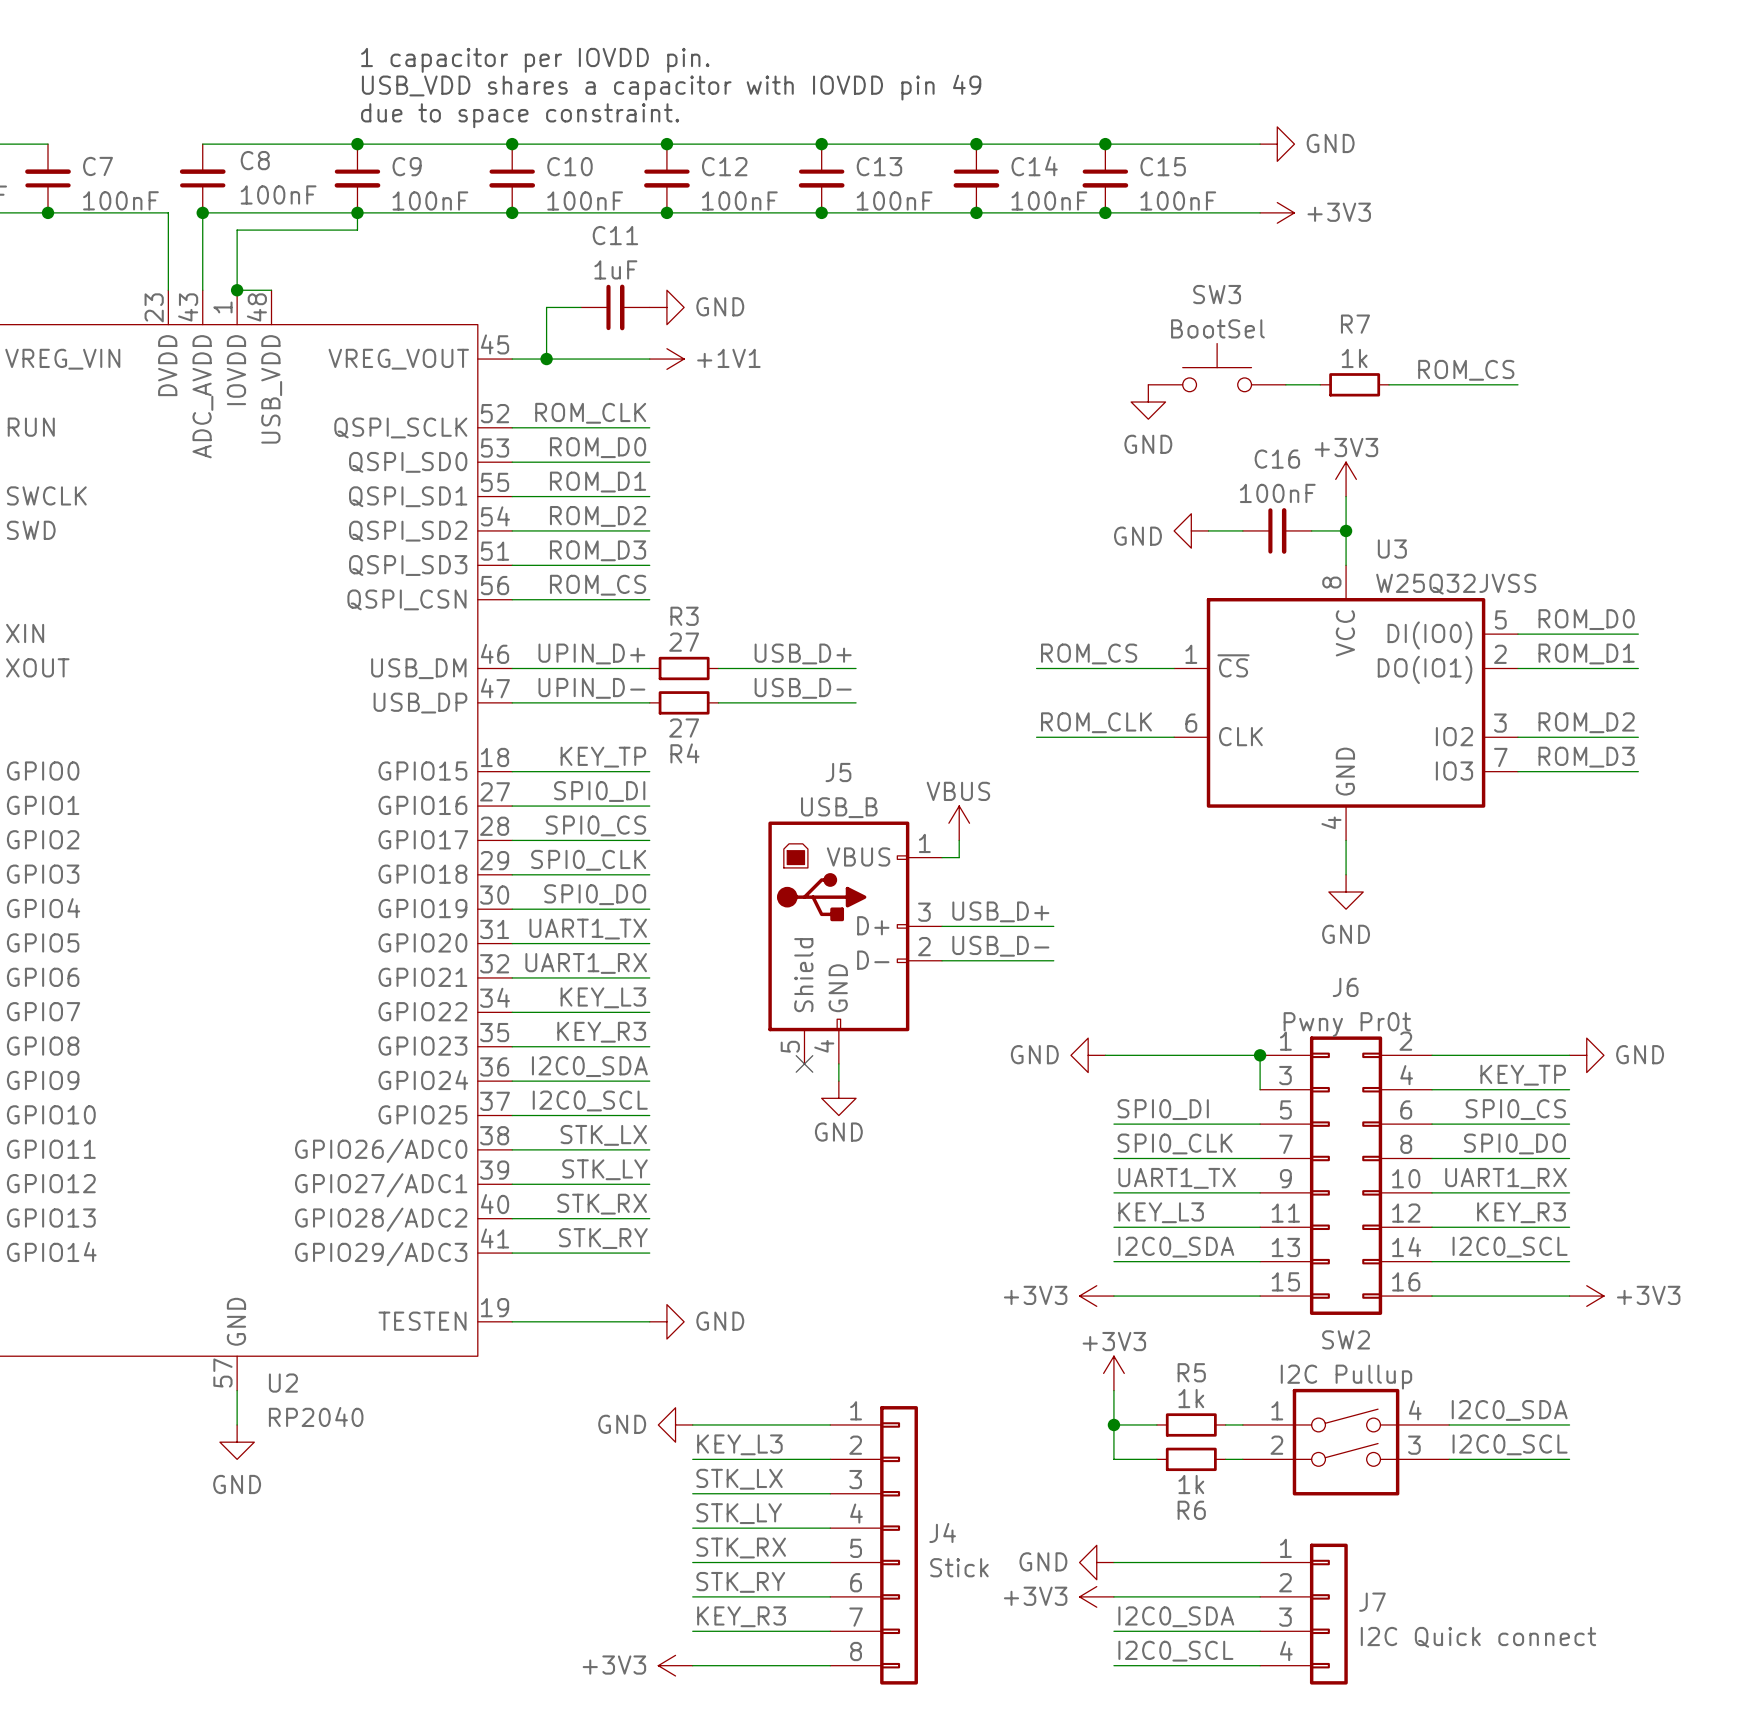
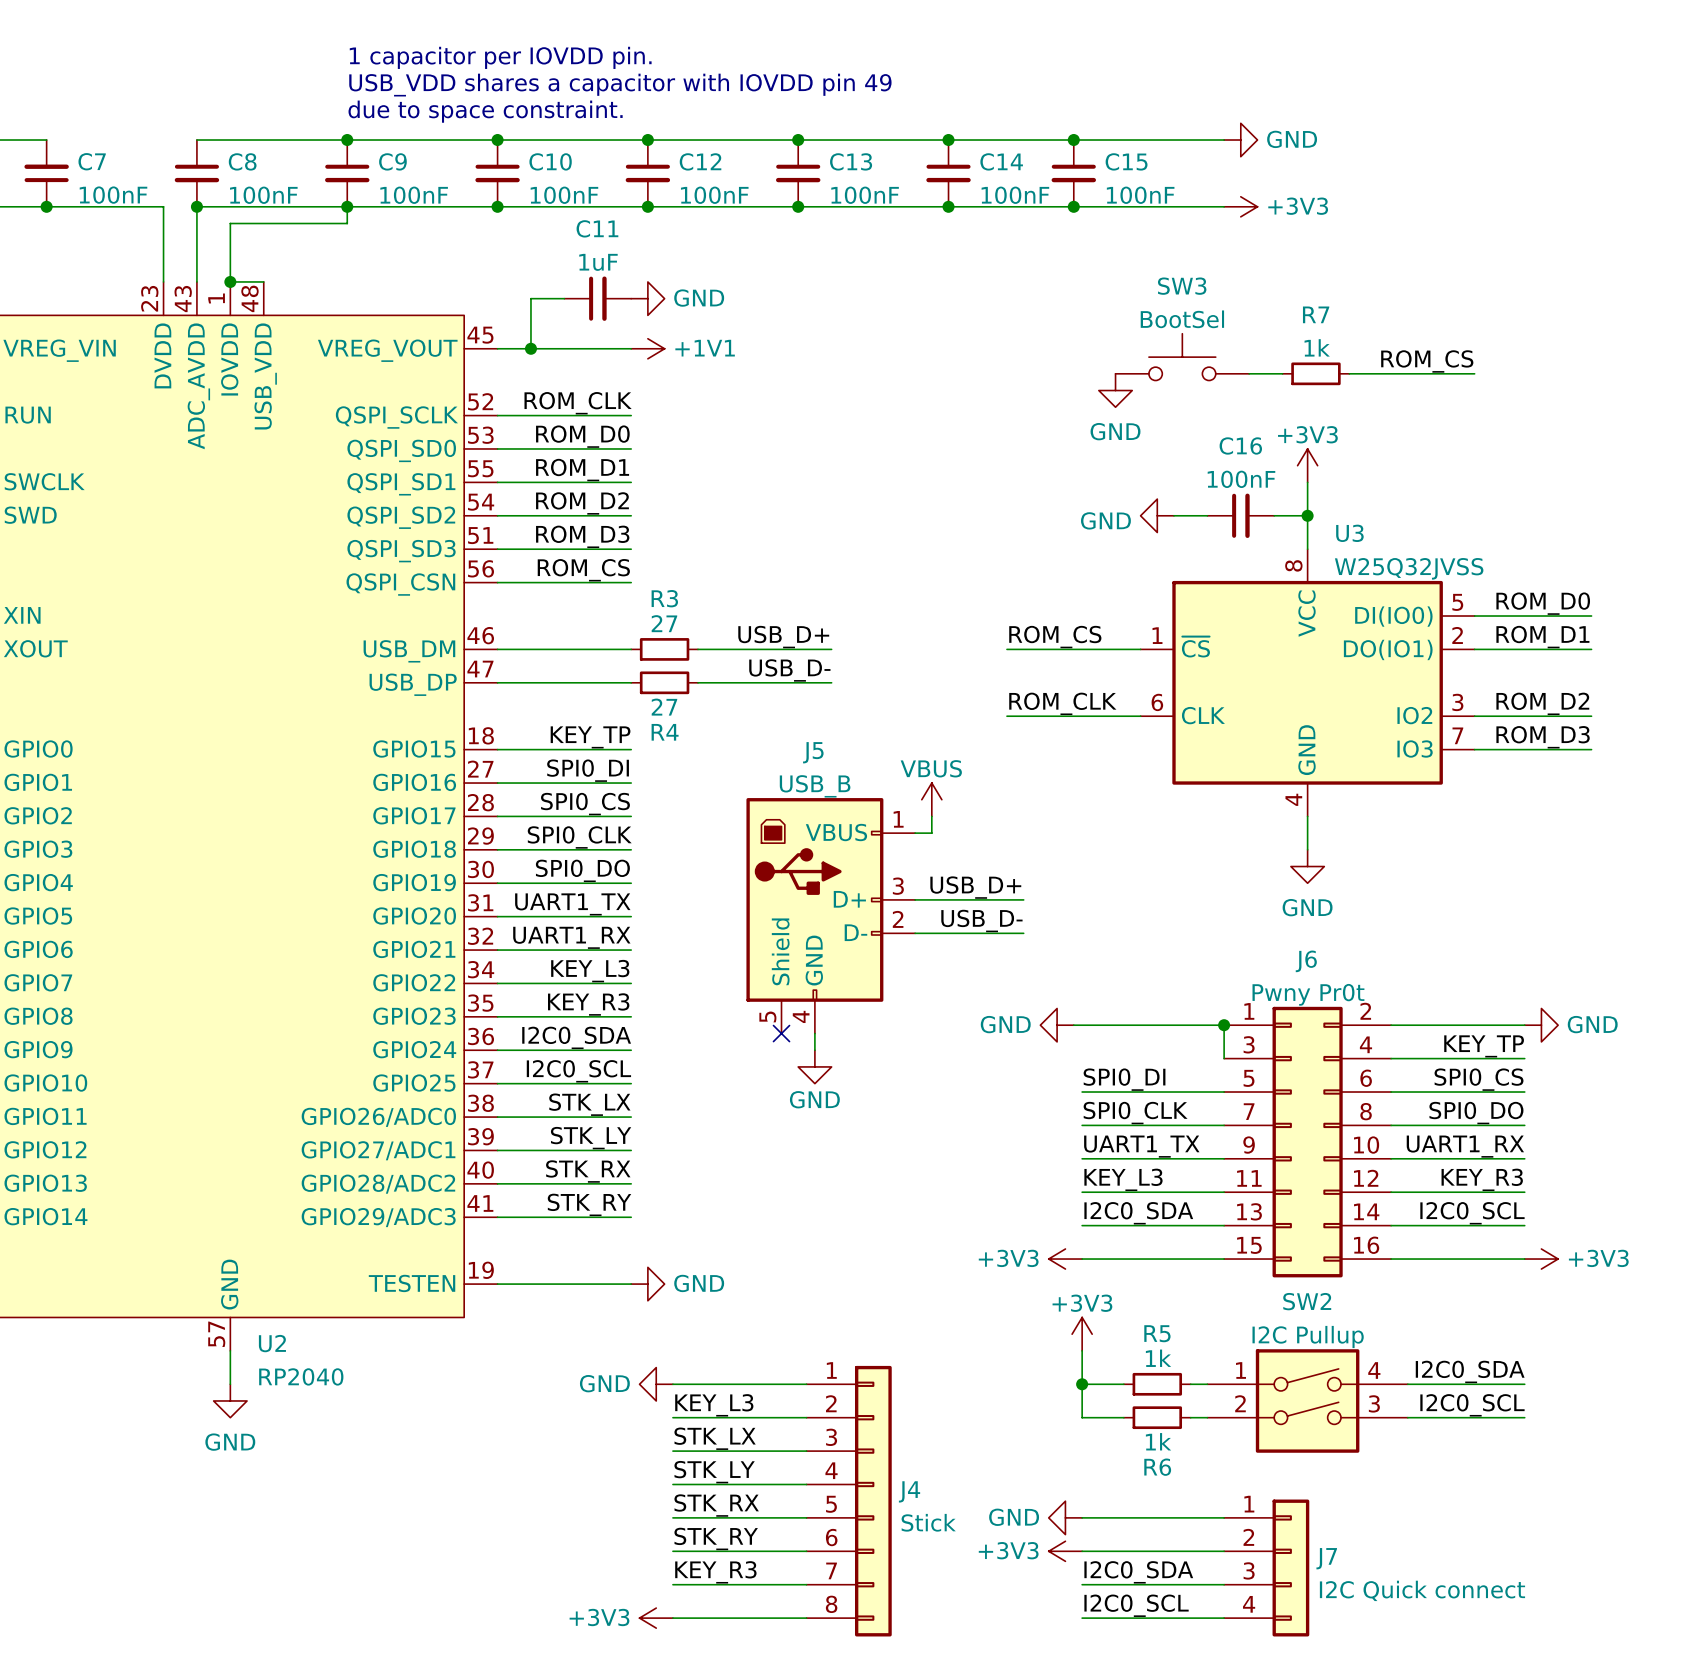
C8 rotation: 0° (202, 178) -> 180° (196, 173)
label: UPIN_D+ (591, 653) -> none
label: UPIN_D- (591, 688) -> none

